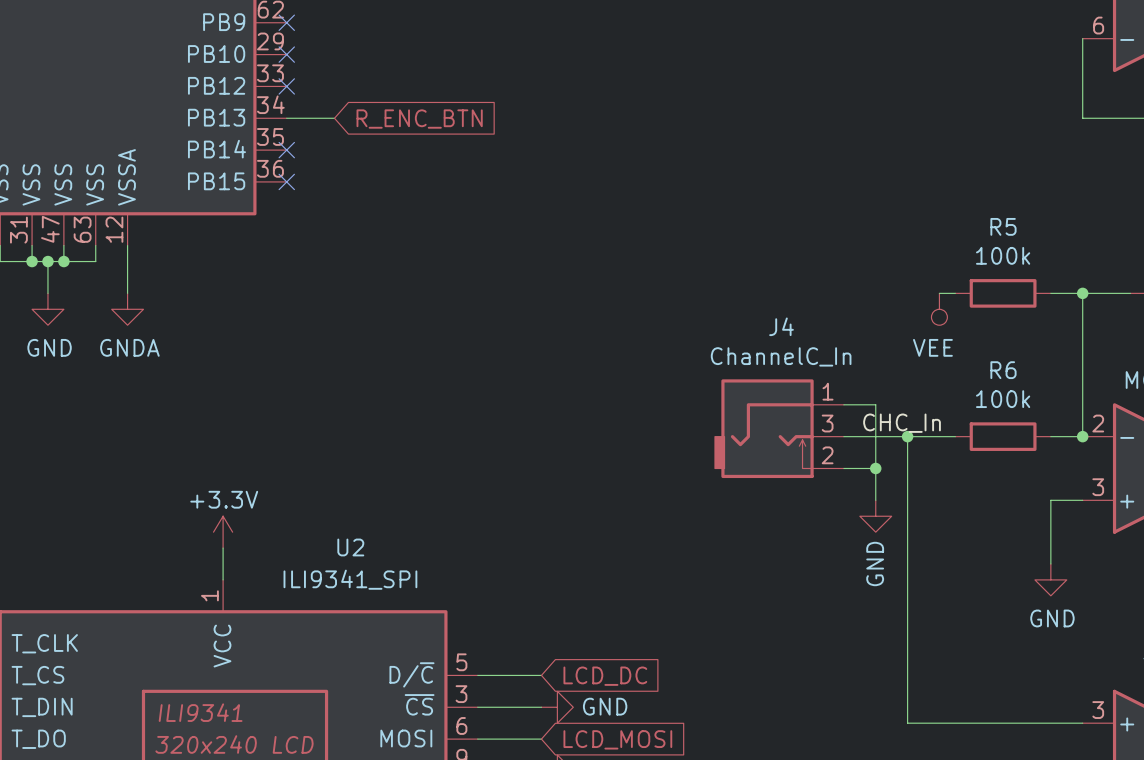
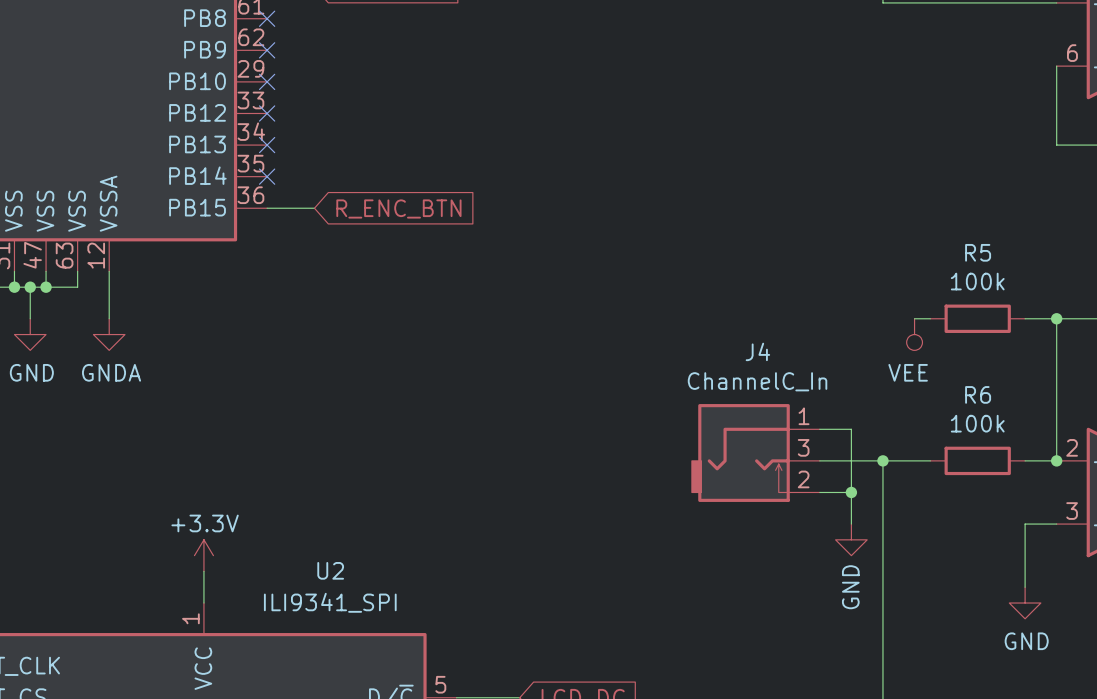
wire: (286, 118) (334, 118) -> (267, 208) (314, 208)
global label position: R_ENC_BTN (419, 119) -> R_ENC_BTN (398, 208)
no-connect mark position: (286, 181) -> (267, 145)
label: CHC_In (902, 423) -> none

